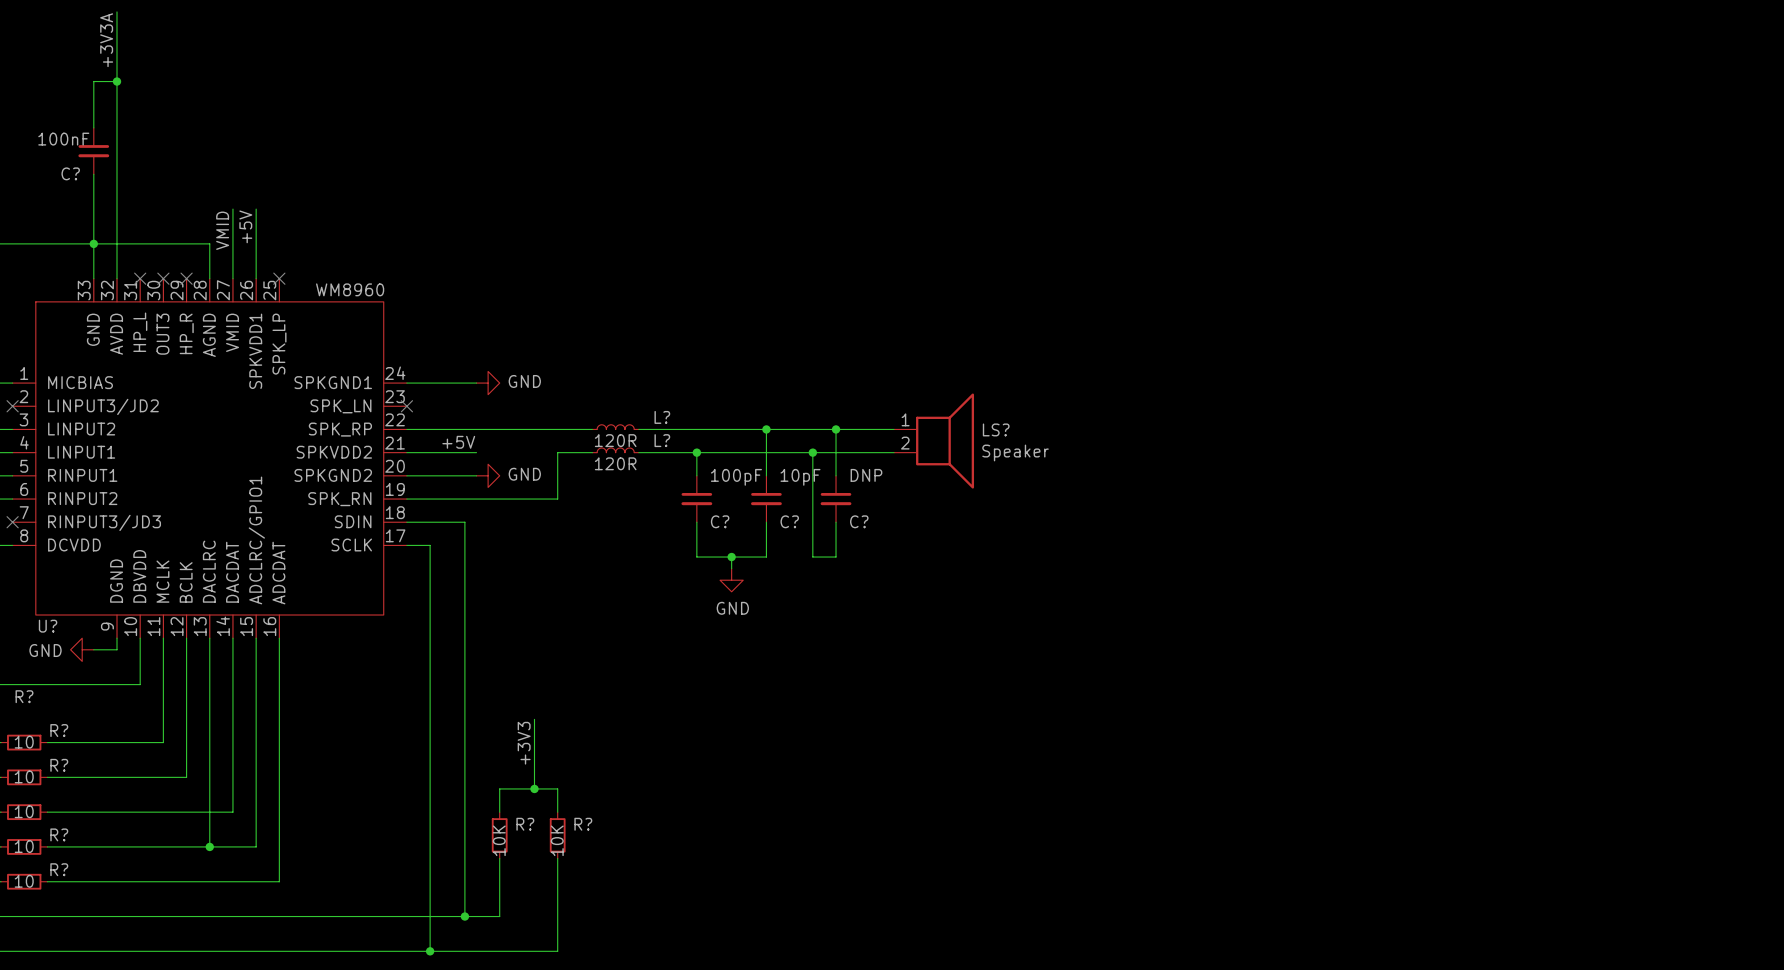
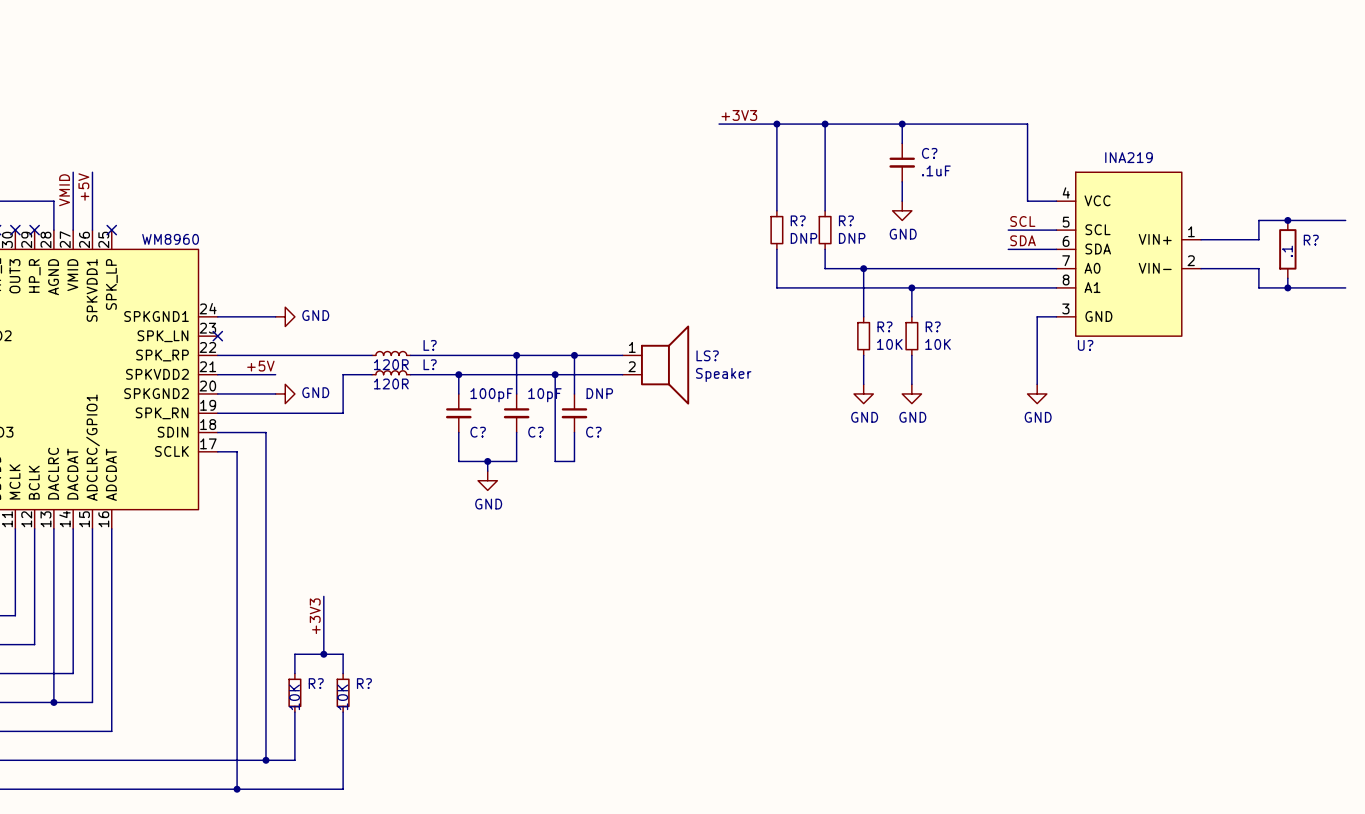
label: none -> +3V3 (739, 115)
wire: none -> (719, 124) (1027, 124) (1027, 201) (1056, 201)
wire: none -> (776, 124) (776, 210)
junction: none -> (776, 124)
wire: none -> (825, 124) (825, 210)
junction: none -> (825, 124)
wire: none -> (902, 124) (902, 143)
junction: none -> (902, 124)
C?: none -> .1uF (902, 162)
wire: none -> (902, 181) (902, 201)
power symbol: none -> GND (902, 210)
junction: none -> (1287, 220)
wire: none -> (1345, 220) (1258, 220) (1258, 239) (1201, 239)
label: none -> SCL (1022, 221)
R?: none -> DNP (776, 230)
R?: none -> DNP (825, 230)
wire: none -> (1008, 230) (1056, 230)
label: none -> SDA (1023, 240)
wire: none -> (776, 249) (776, 287) (1056, 287)
wire: none -> (825, 249) (825, 268) (1056, 268)
wire: none -> (1008, 249) (1056, 249)
R?: none -> .1 (1287, 249)
U?: none -> INA219 (1128, 254)
wire: none -> (863, 268) (863, 316)
junction: none -> (863, 268)
wire: none -> (1201, 268) (1258, 268) (1258, 287) (1345, 287)
wire: none -> (1287, 278) (1287, 287)
wire: none -> (911, 287) (911, 316)
junction: none -> (911, 287)
junction: none -> (1287, 287)
wire: none -> (1056, 316) (1037, 316) (1037, 384)
R?: none -> 10K (863, 336)
R?: none -> 10K (911, 336)
wire: none -> (863, 355) (863, 384)
wire: none -> (911, 355) (911, 384)
power symbol: none -> GND (863, 393)
power symbol: none -> GND (911, 393)
power symbol: none -> GND (1037, 393)

